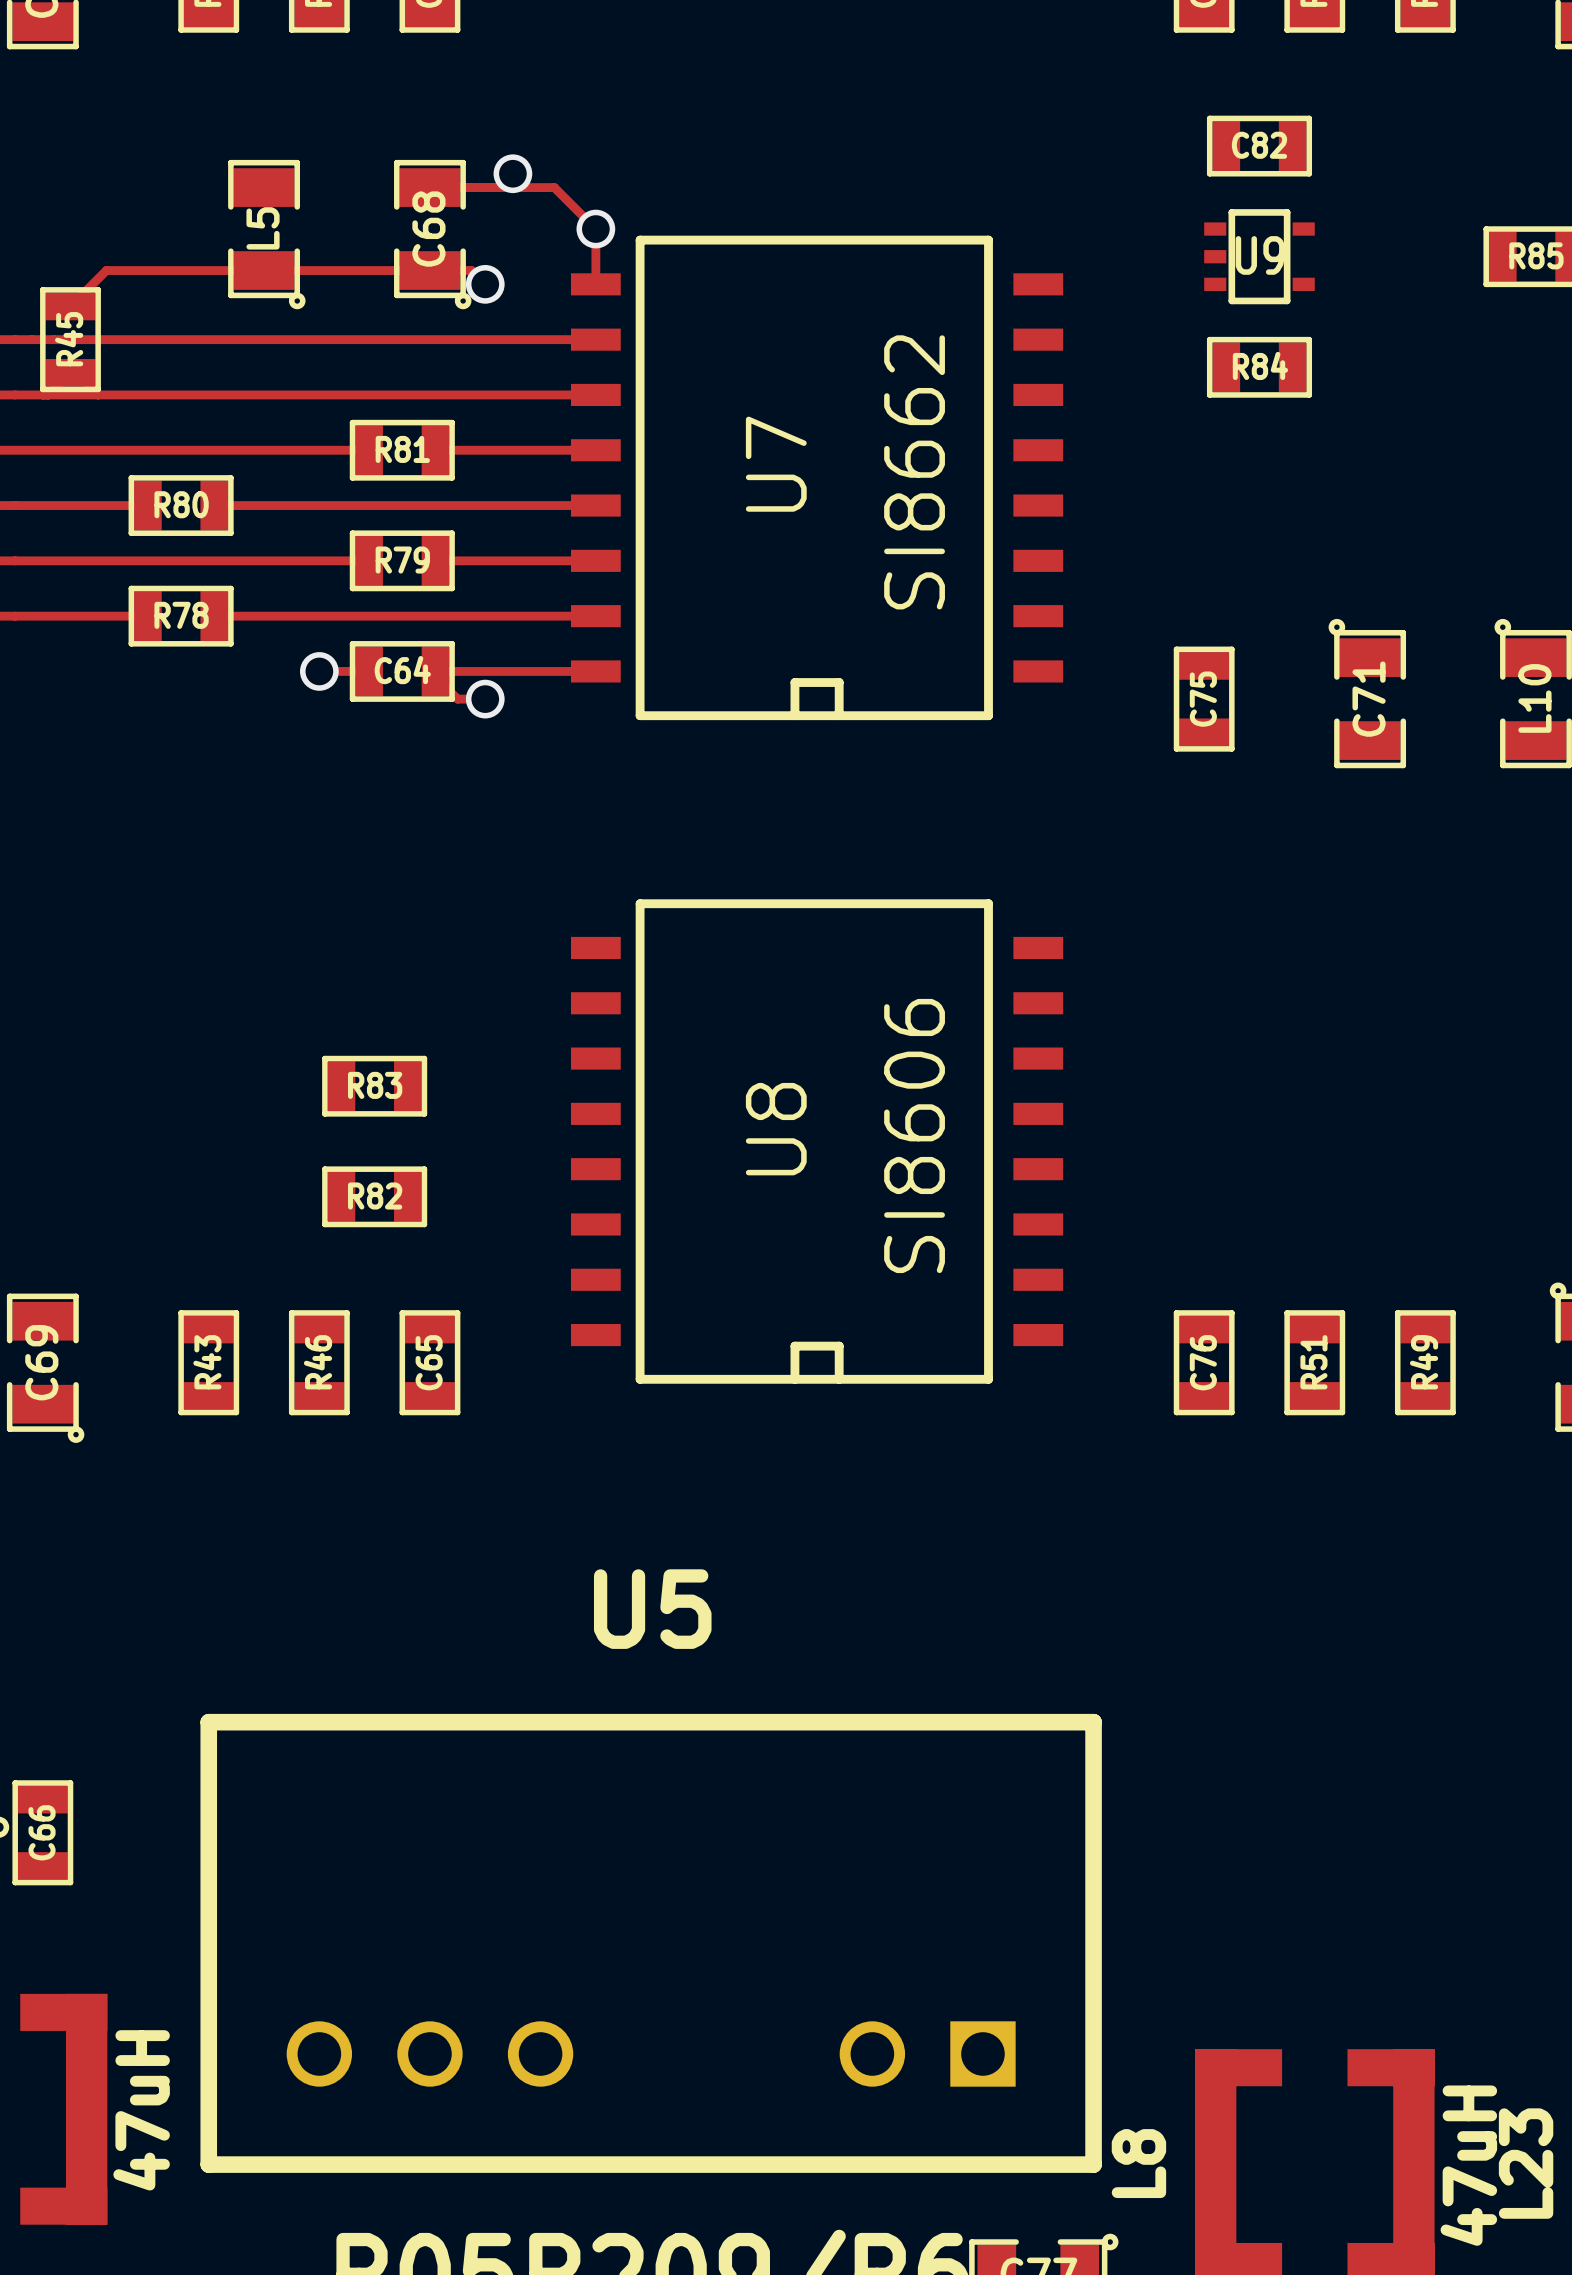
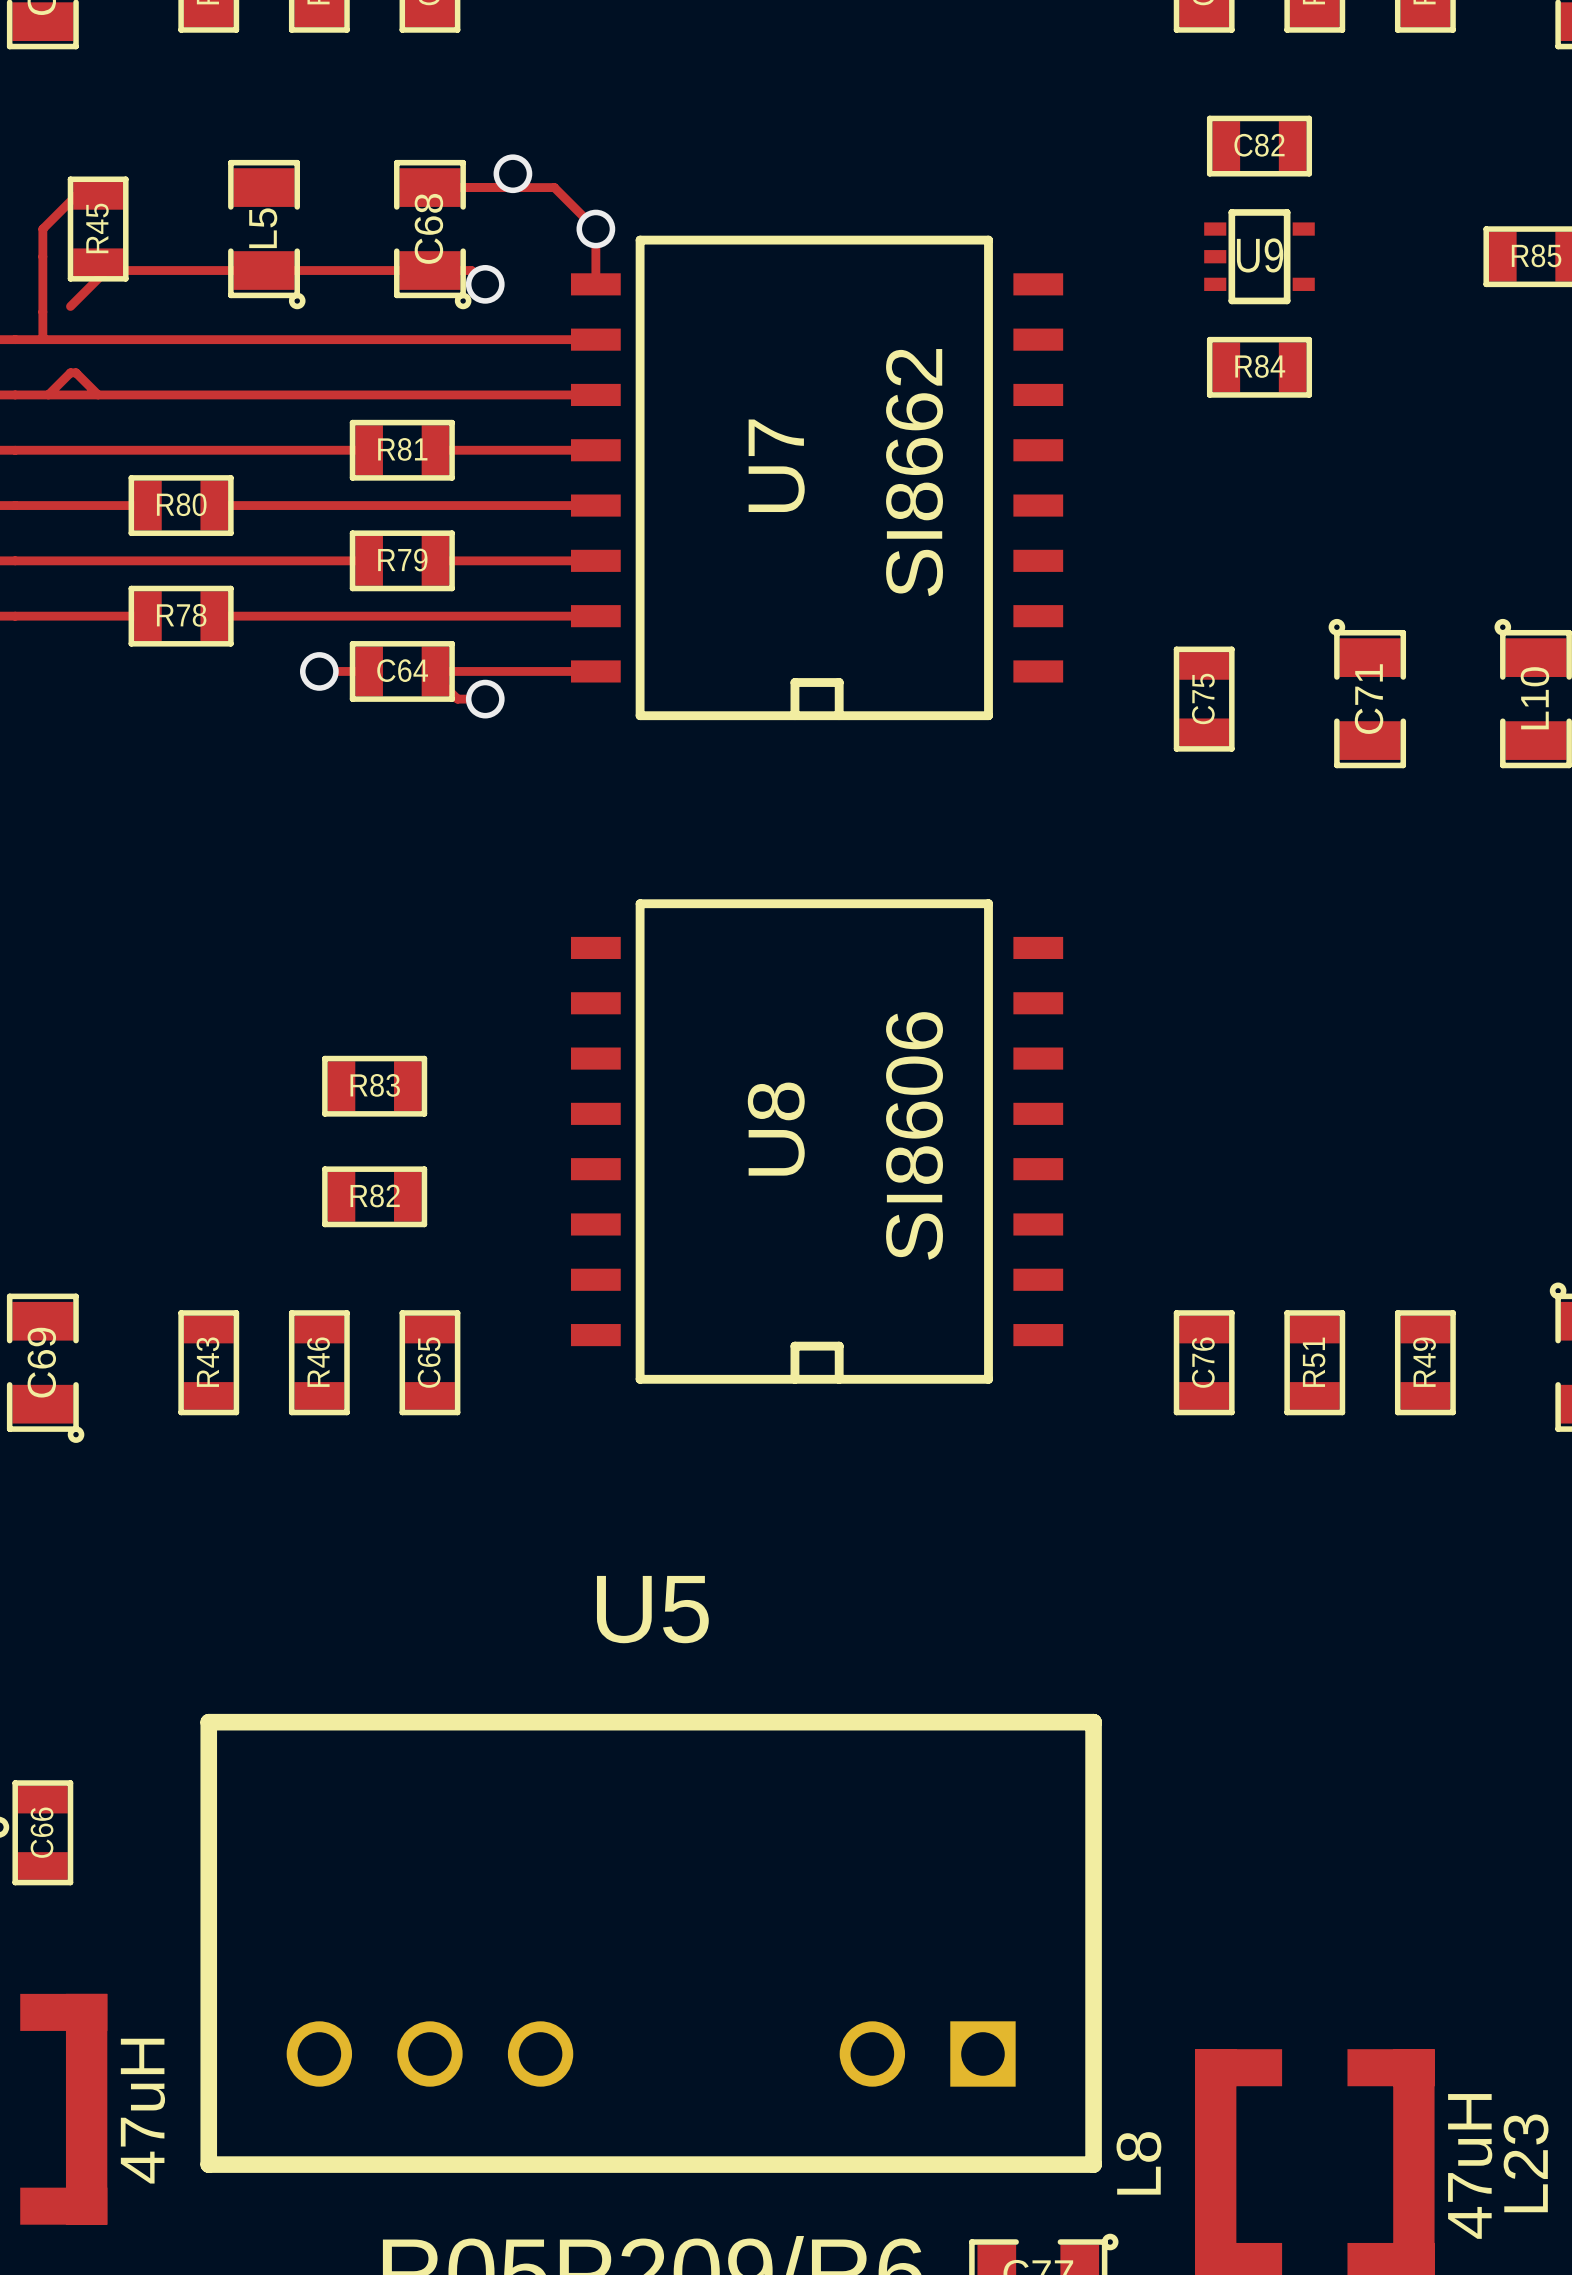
track: none -> (98, 195) (76, 195) (42, 229) (42, 339)
R45 position: (70, 339) -> (98, 229)

